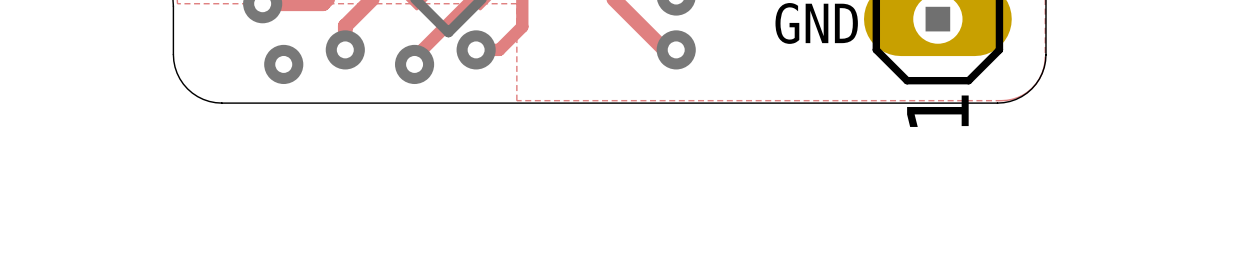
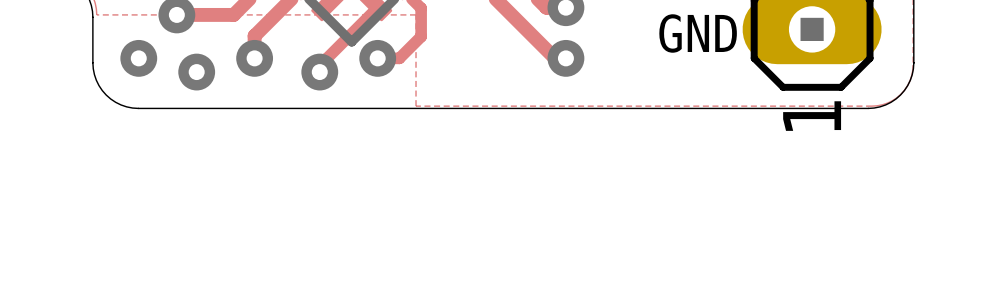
via: none -> (138, 58)

